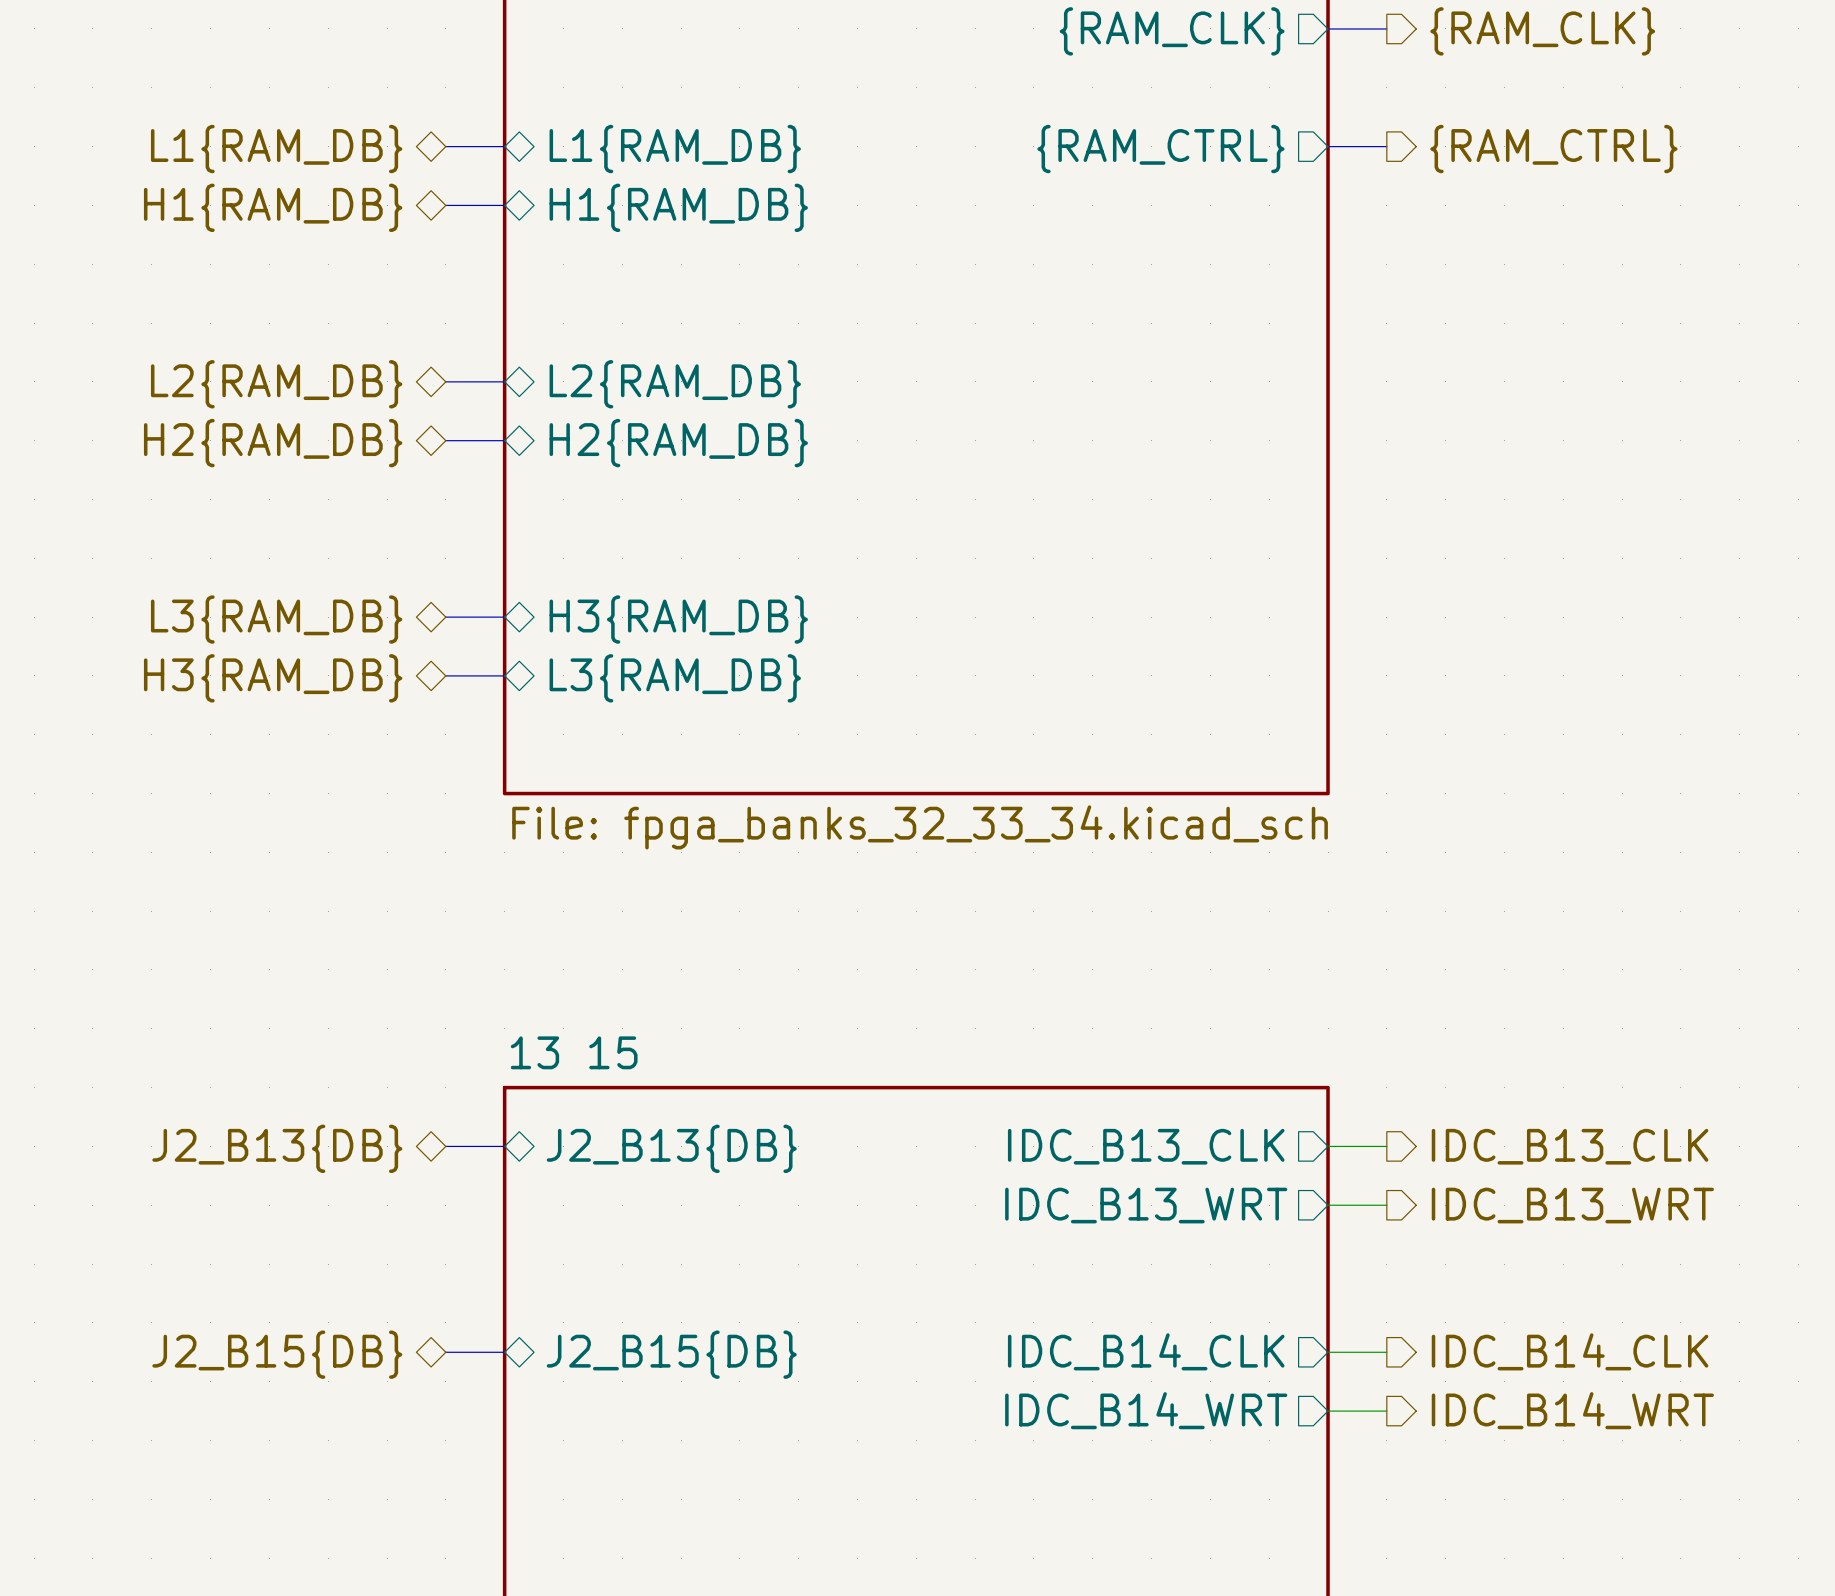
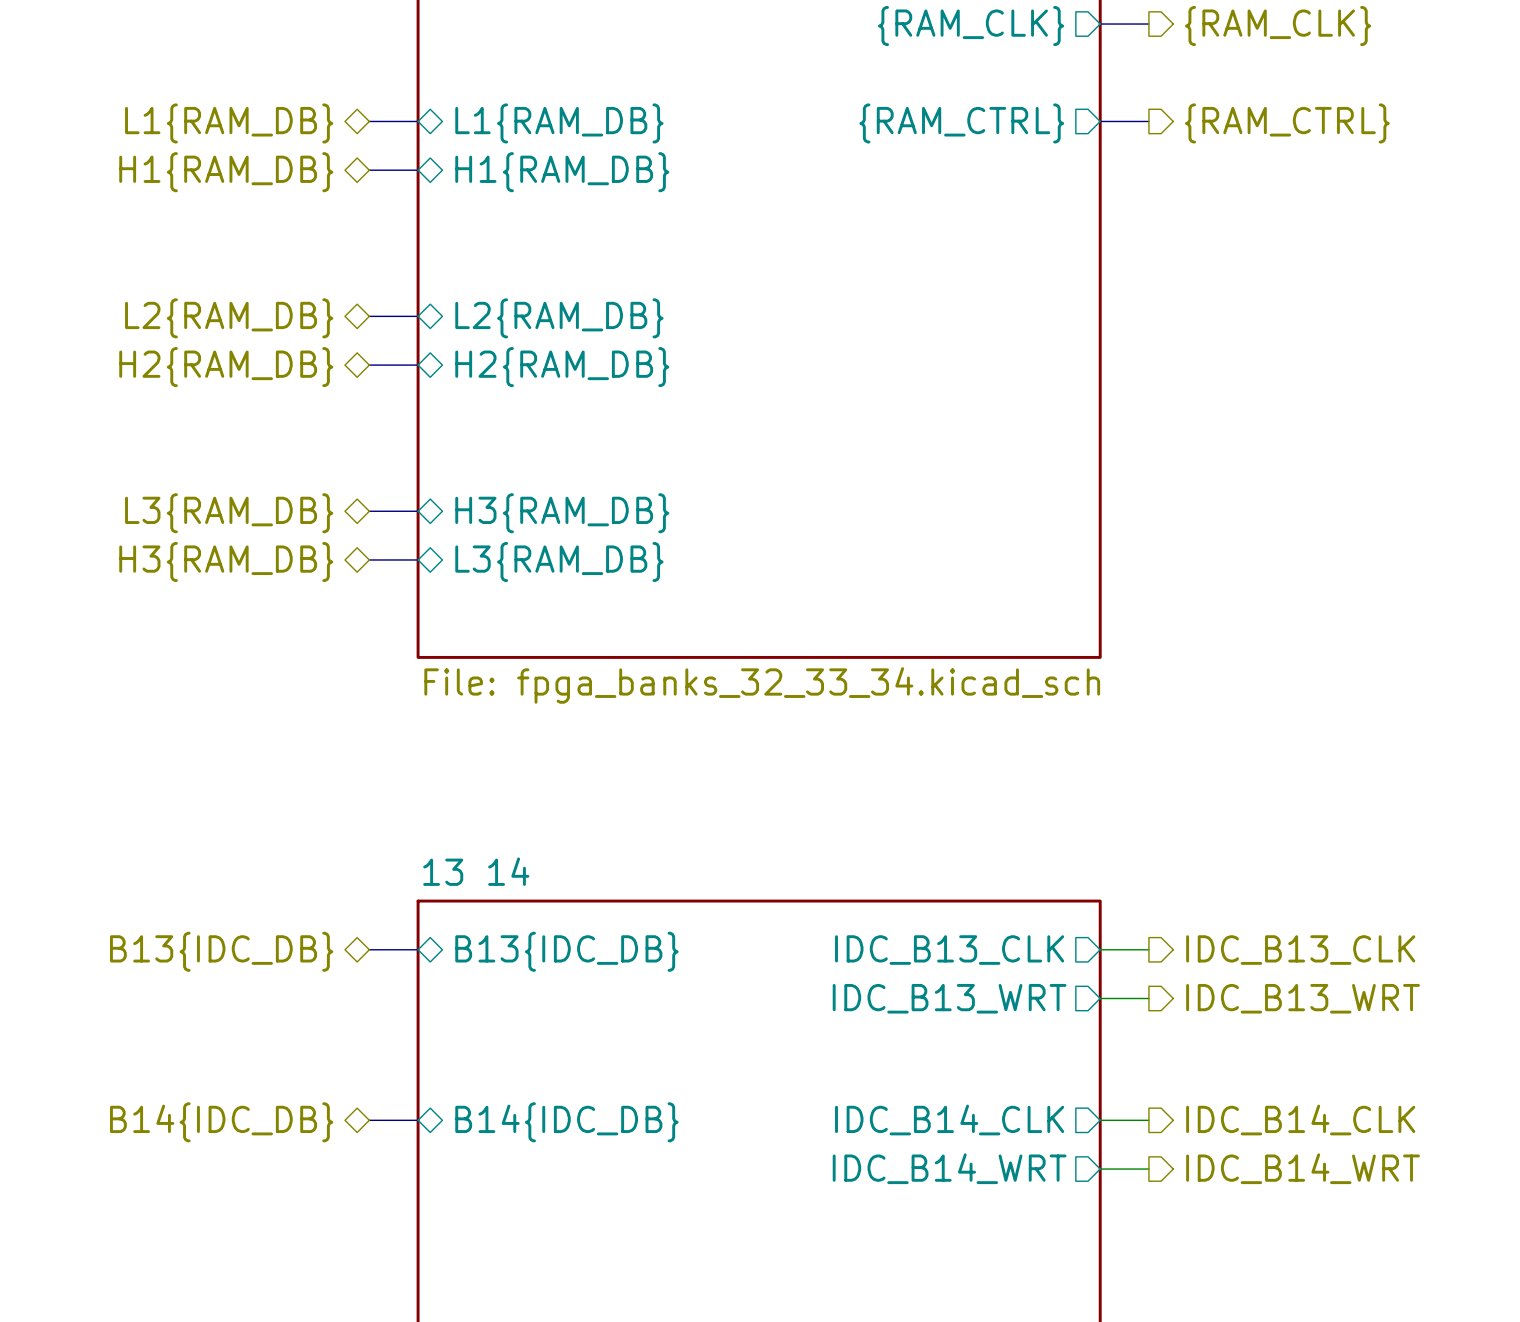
sheet 13 15 name: 13 15 (574, 1052) -> 13 14 (476, 871)
hierarchical label: J2_B13{DB} (277, 1148) -> B13{IDC_DB} (221, 951)
sheet pin: J2_B13{DB} (671, 1148) -> B13{IDC_DB} (566, 951)
hierarchical label: J2_B15{DB} (277, 1354) -> B14{IDC_DB} (221, 1122)
sheet pin: J2_B15{DB} (671, 1354) -> B14{IDC_DB} (566, 1122)

